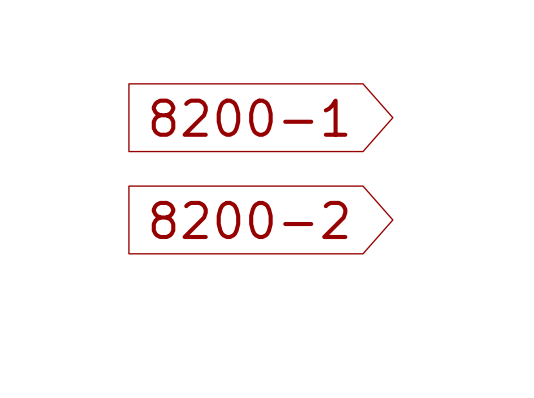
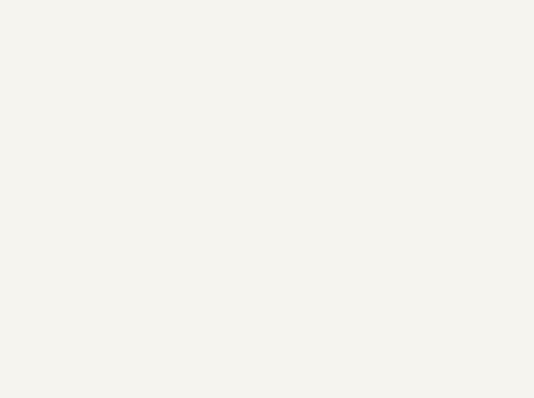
global label: 8200-1 (249, 117) -> none
global label: 8200-2 (249, 219) -> none

